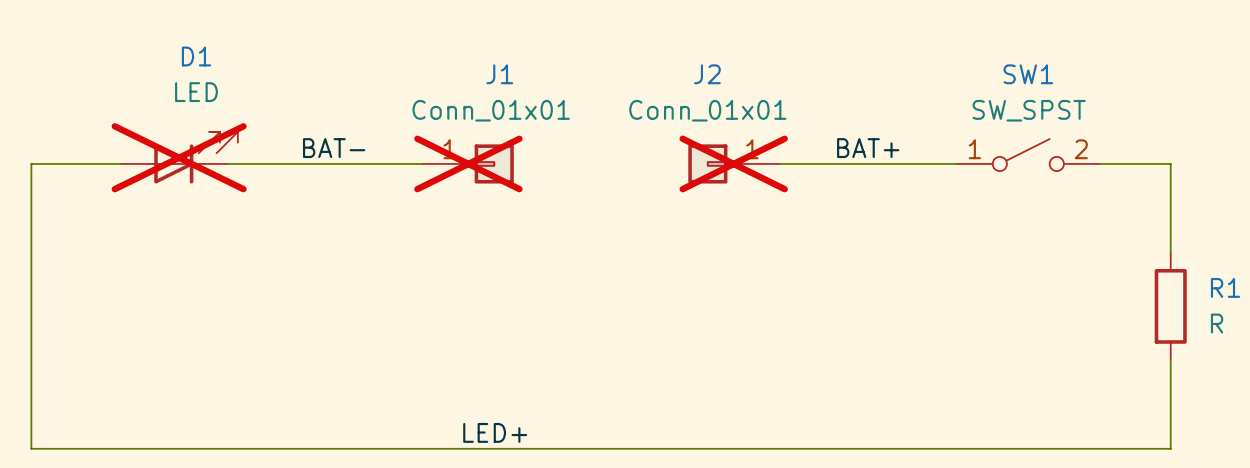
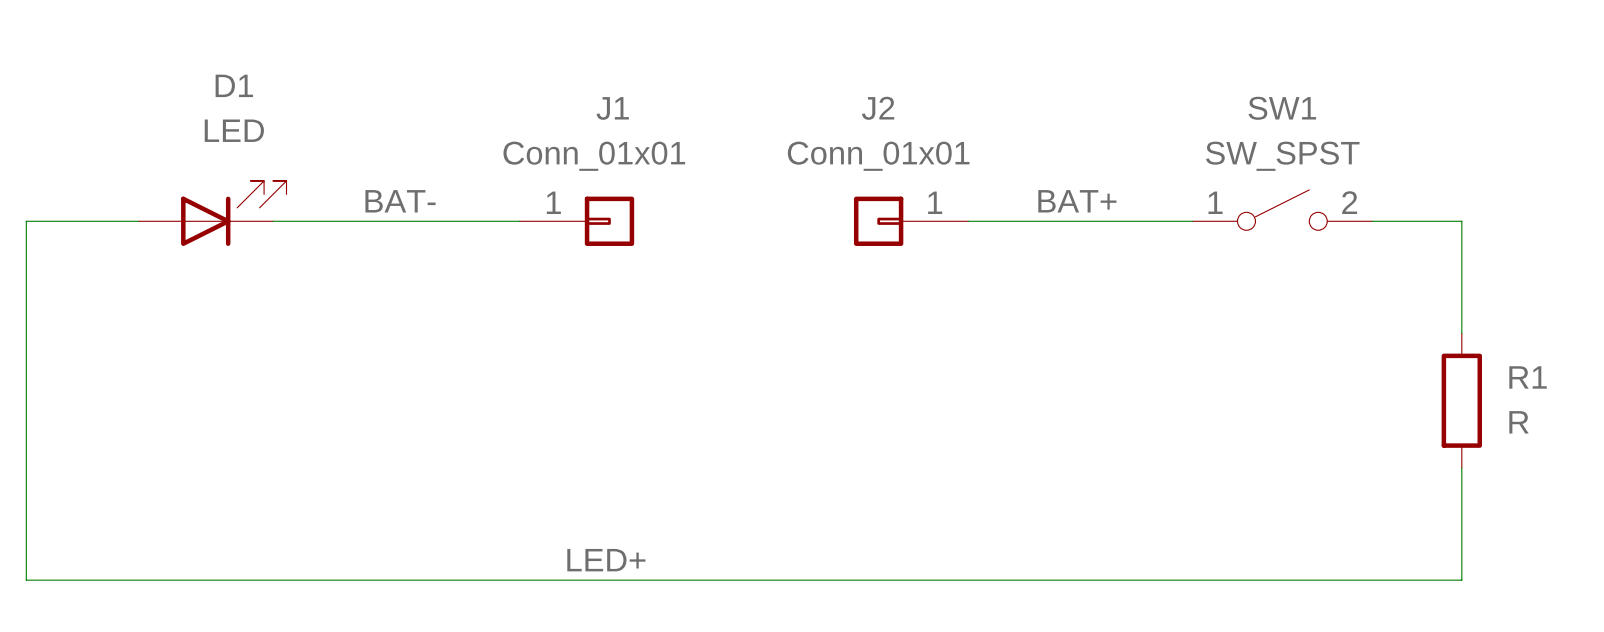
D1 do-not-place cross: (179, 157) -> none
J1 do-not-place cross: (468, 163) -> none
J2 do-not-place cross: (733, 163) -> none

